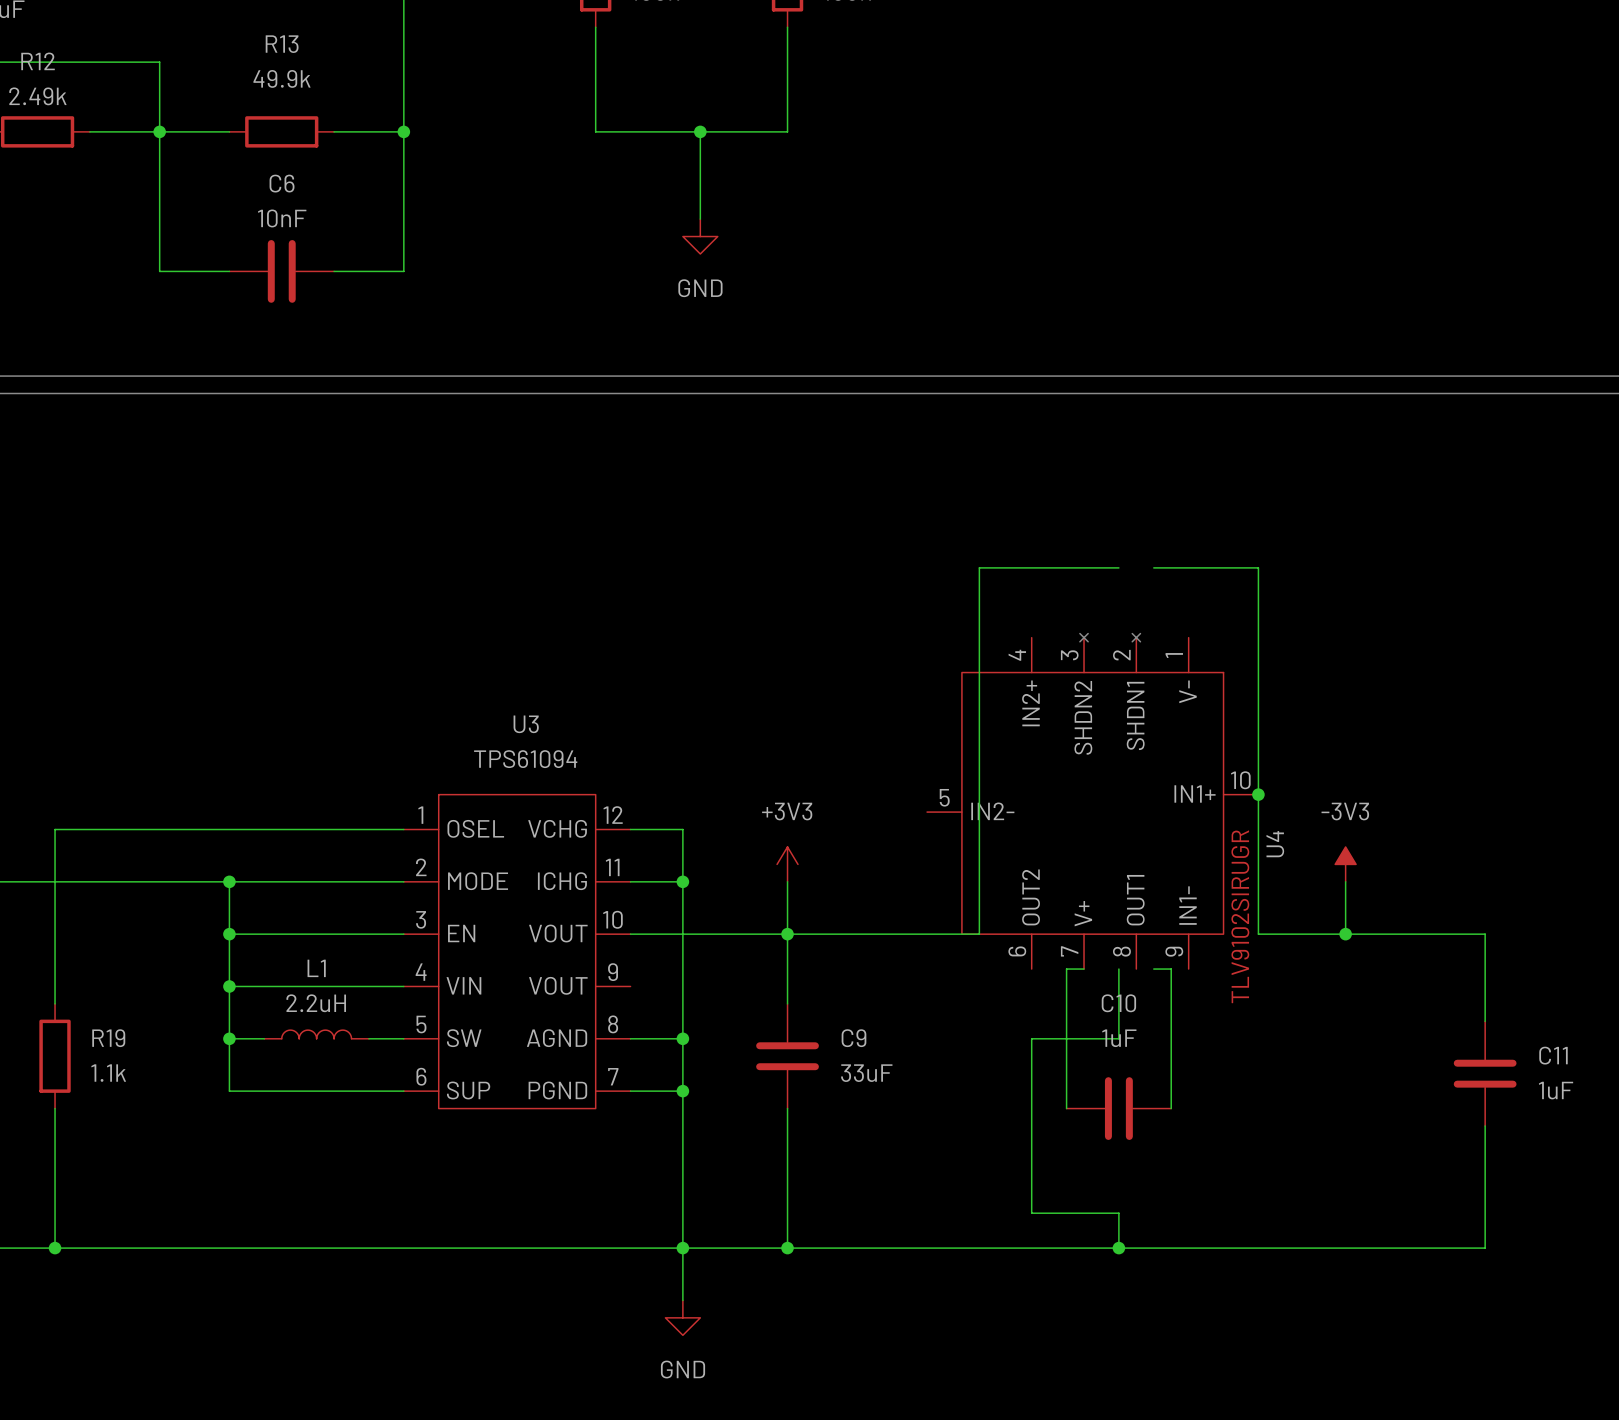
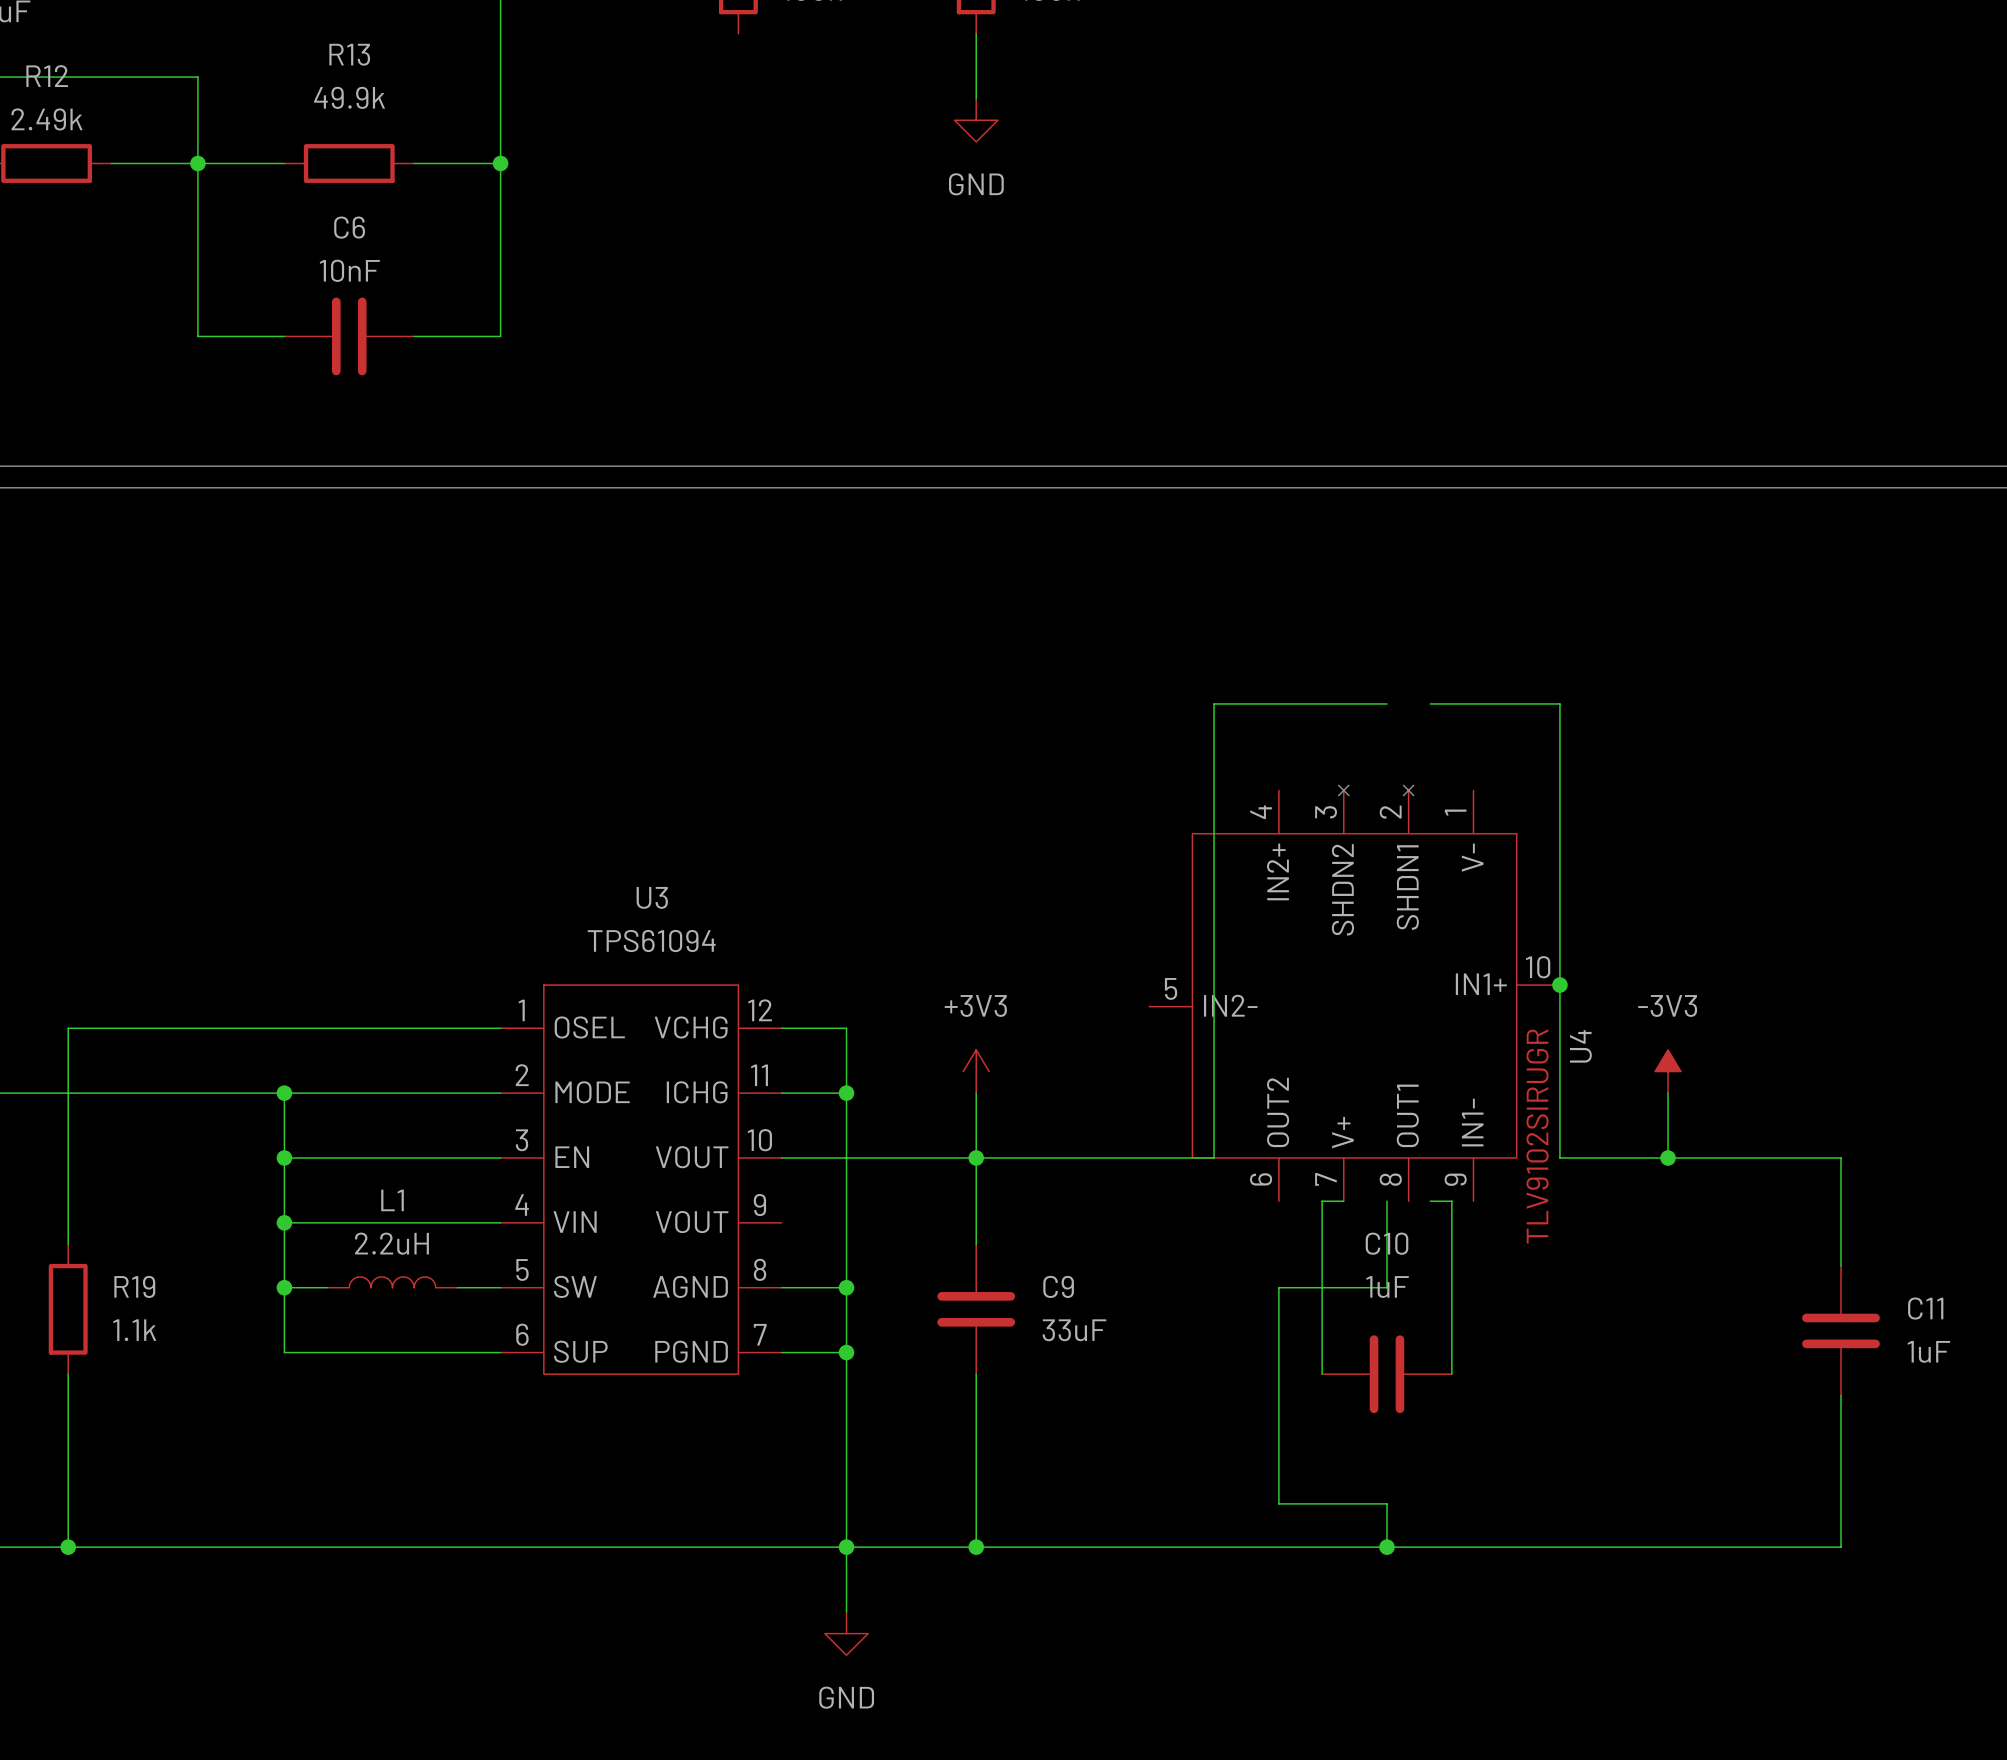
wire: (595, 27) (595, 131) (787, 131) (787, 79) -> none
wire: (700, 131) (700, 219) -> none
junction: (700, 131) -> none
power symbol position: GND (700, 236) -> GND (976, 120)

